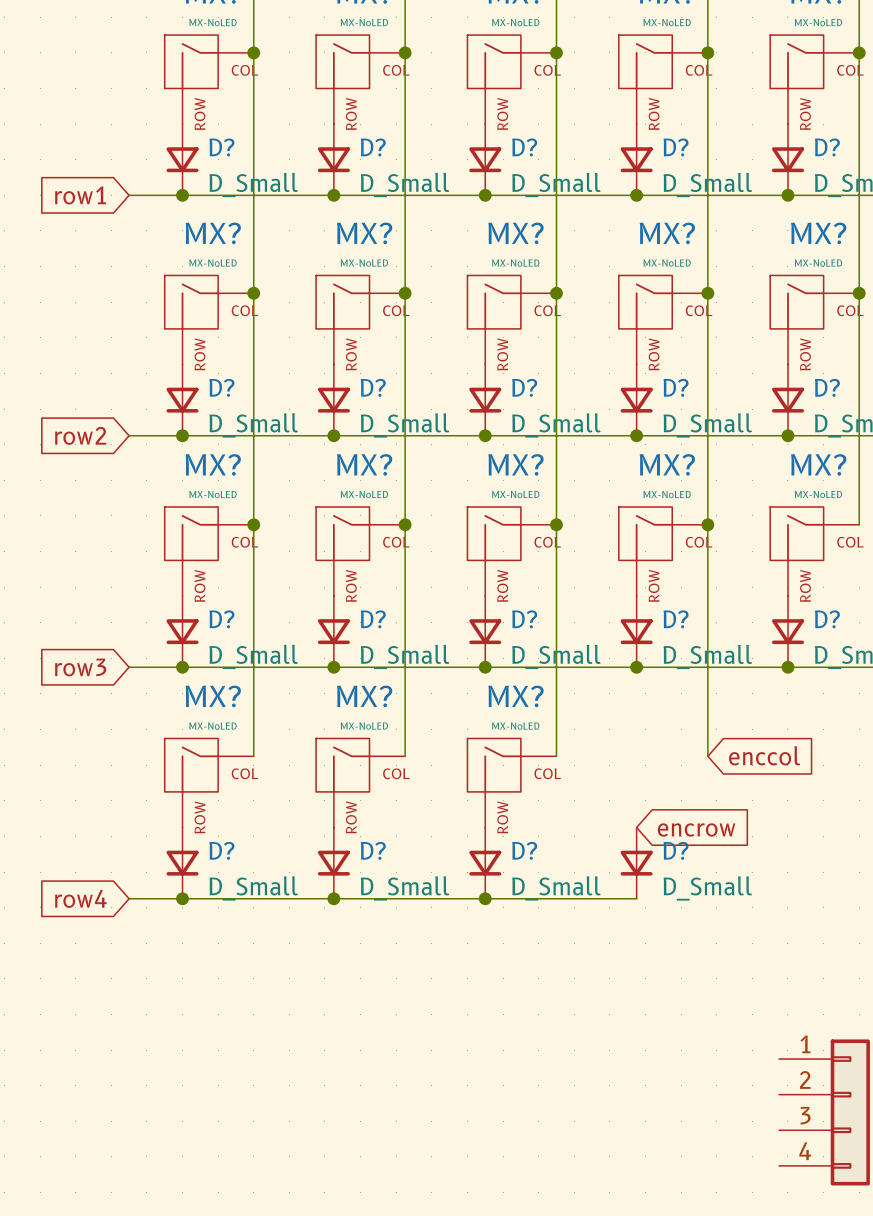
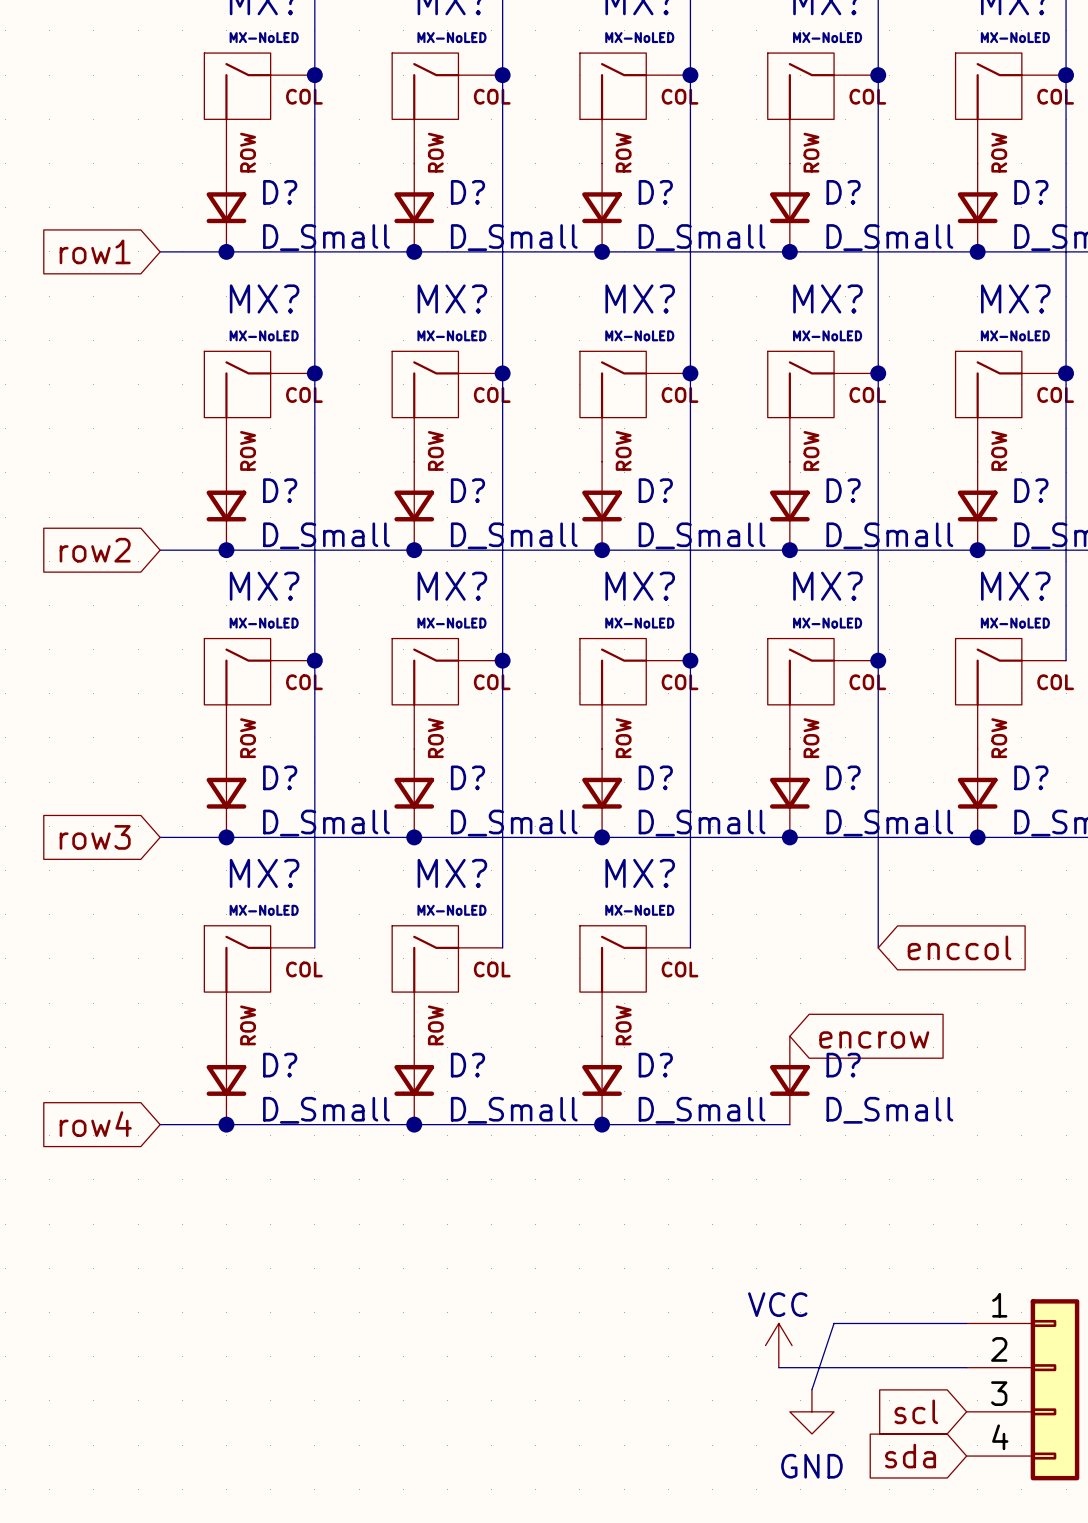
wire: none -> (966, 1323) (834, 1323) (811, 1389)
power symbol: none -> VCC (778, 1345)
wire: none -> (778, 1367) (966, 1367)
global label: none -> scl (916, 1411)
power symbol: none -> GND (811, 1411)
global label: none -> sda (910, 1456)

